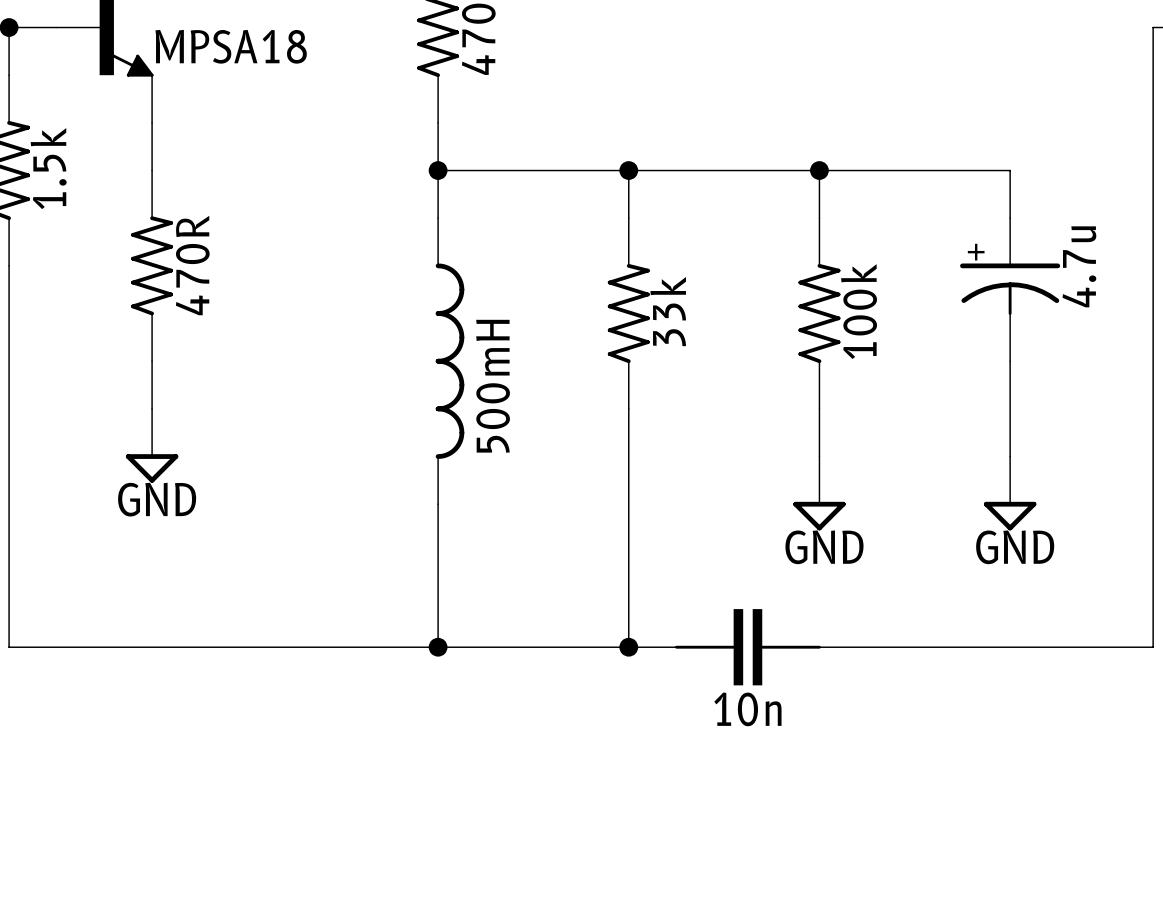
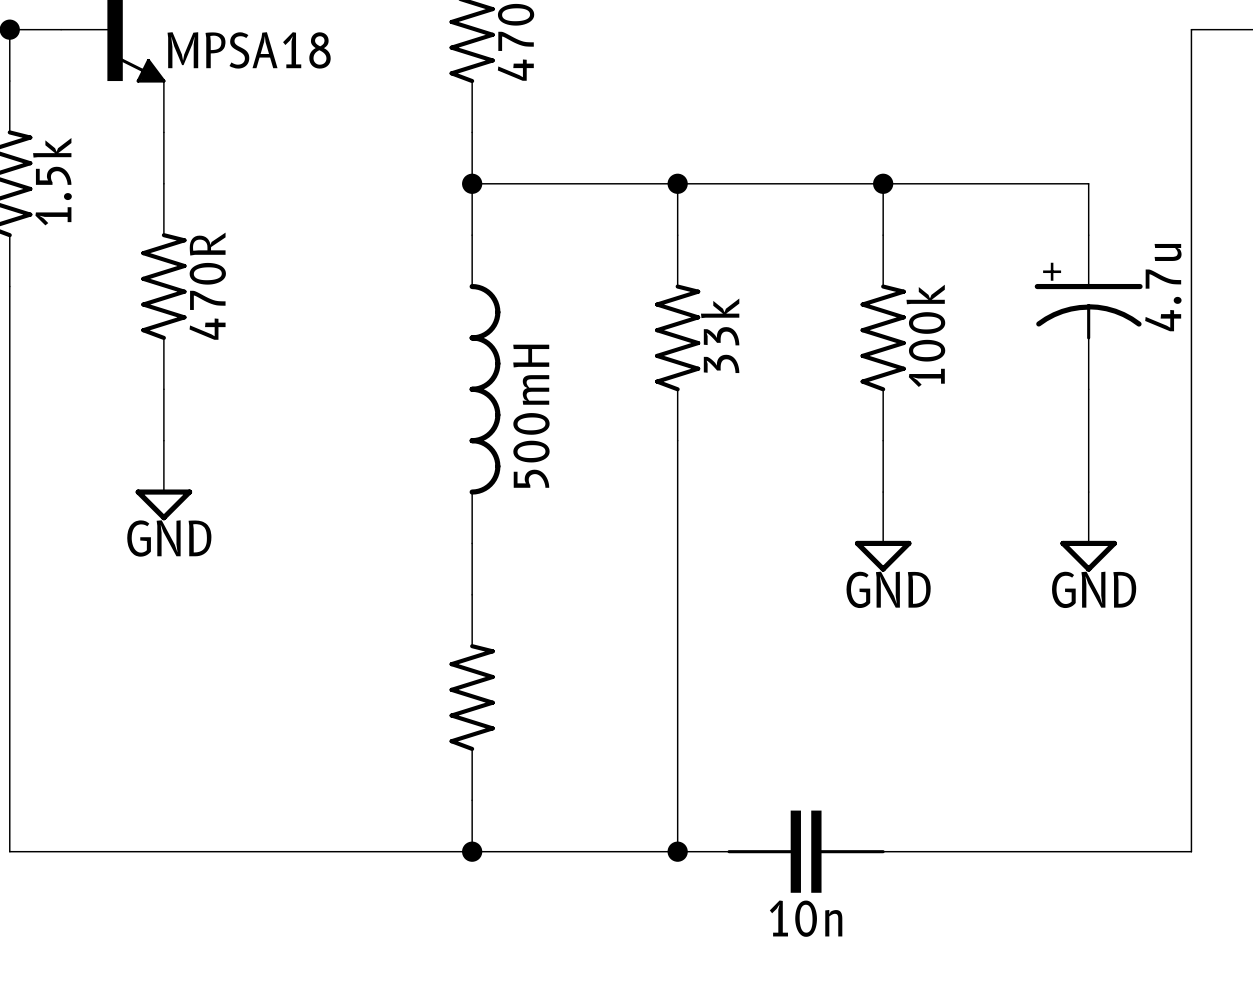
wire: (1153, 27) (1153, 647) (819, 647) -> (1242, 29) (1191, 29) (1191, 851) (883, 851)
wire: (9, 647) (676, 647) -> (9, 697) (9, 851) (729, 851)
part: none -> (472, 697)
junction: (438, 647) -> none
wire: none -> (677, 697) (677, 851)
junction: (628, 647) -> none
part position: (747, 647) -> (806, 851)
wire: none -> (472, 800) (472, 851)
junction: none -> (472, 851)
junction: none -> (677, 851)

